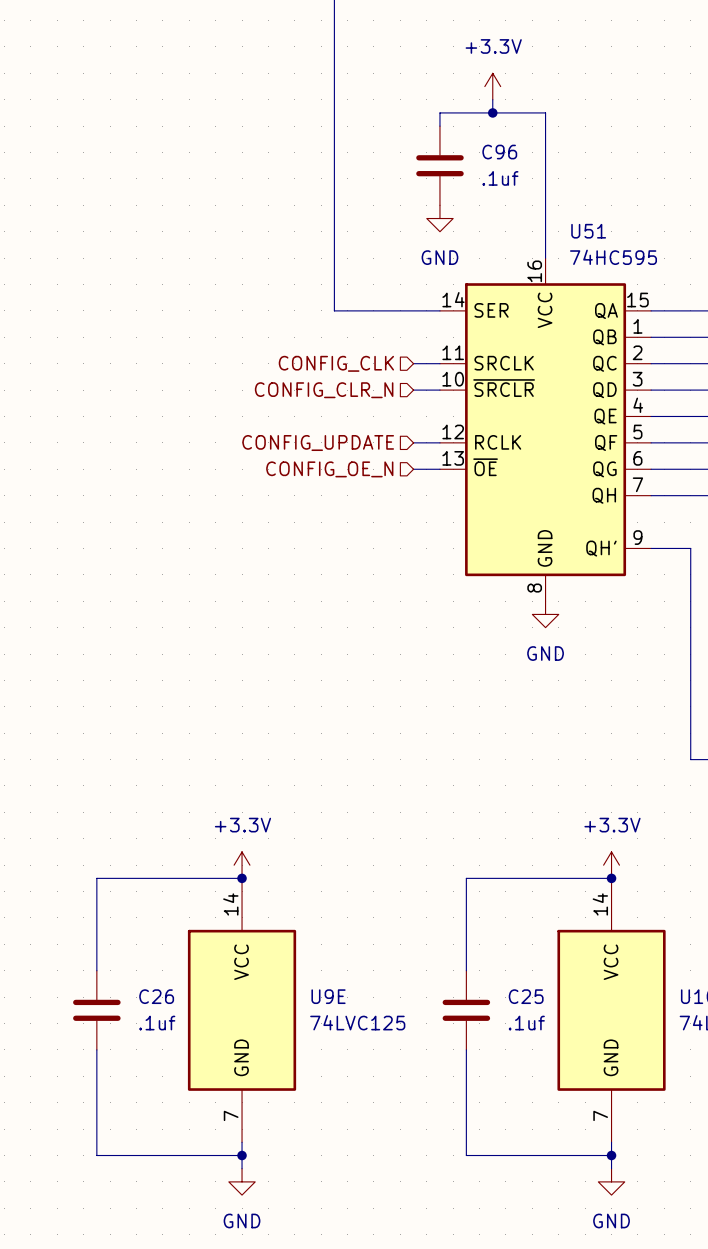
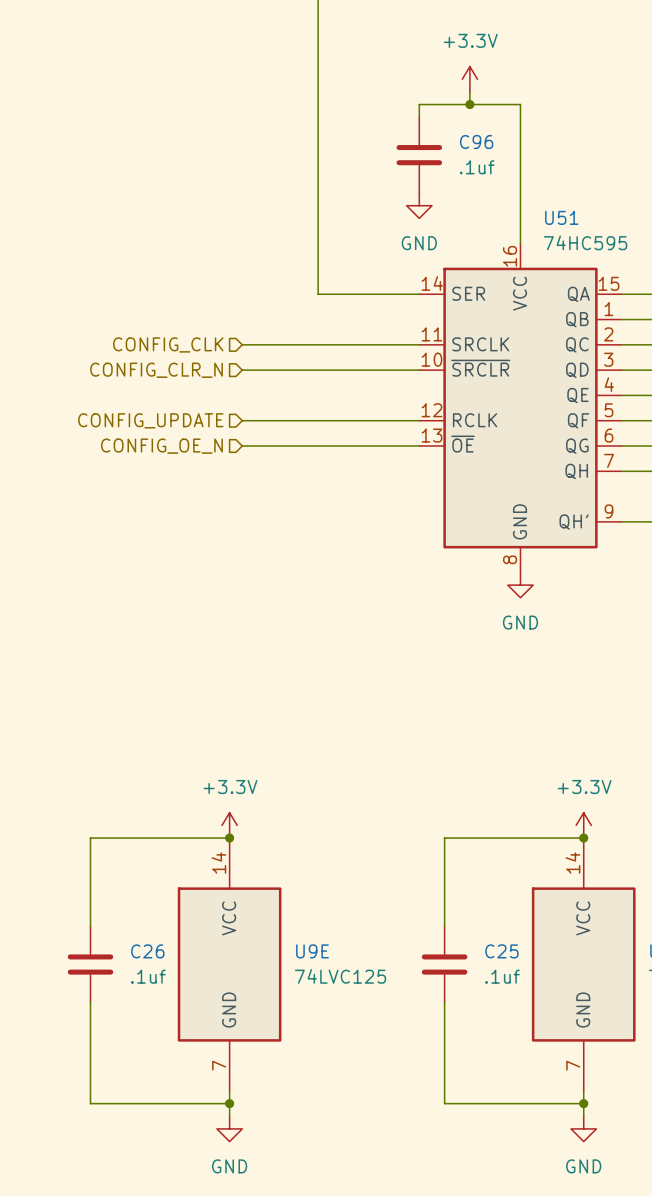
wire: none -> (242, 344) (394, 344)
hierarchical label position: CONFIG_CLK (336, 363) -> CONFIG_CLK (168, 344)
wire: none -> (242, 370) (394, 370)
hierarchical label position: CONFIG_CLR_N (324, 390) -> CONFIG_CLR_N (156, 370)
wire: none -> (242, 420) (394, 420)
hierarchical label position: CONFIG_UPDATE (318, 443) -> CONFIG_UPDATE (150, 420)
wire: none -> (242, 446) (394, 446)
hierarchical label position: CONFIG_OE_N (329, 469) -> CONFIG_OE_N (161, 446)

